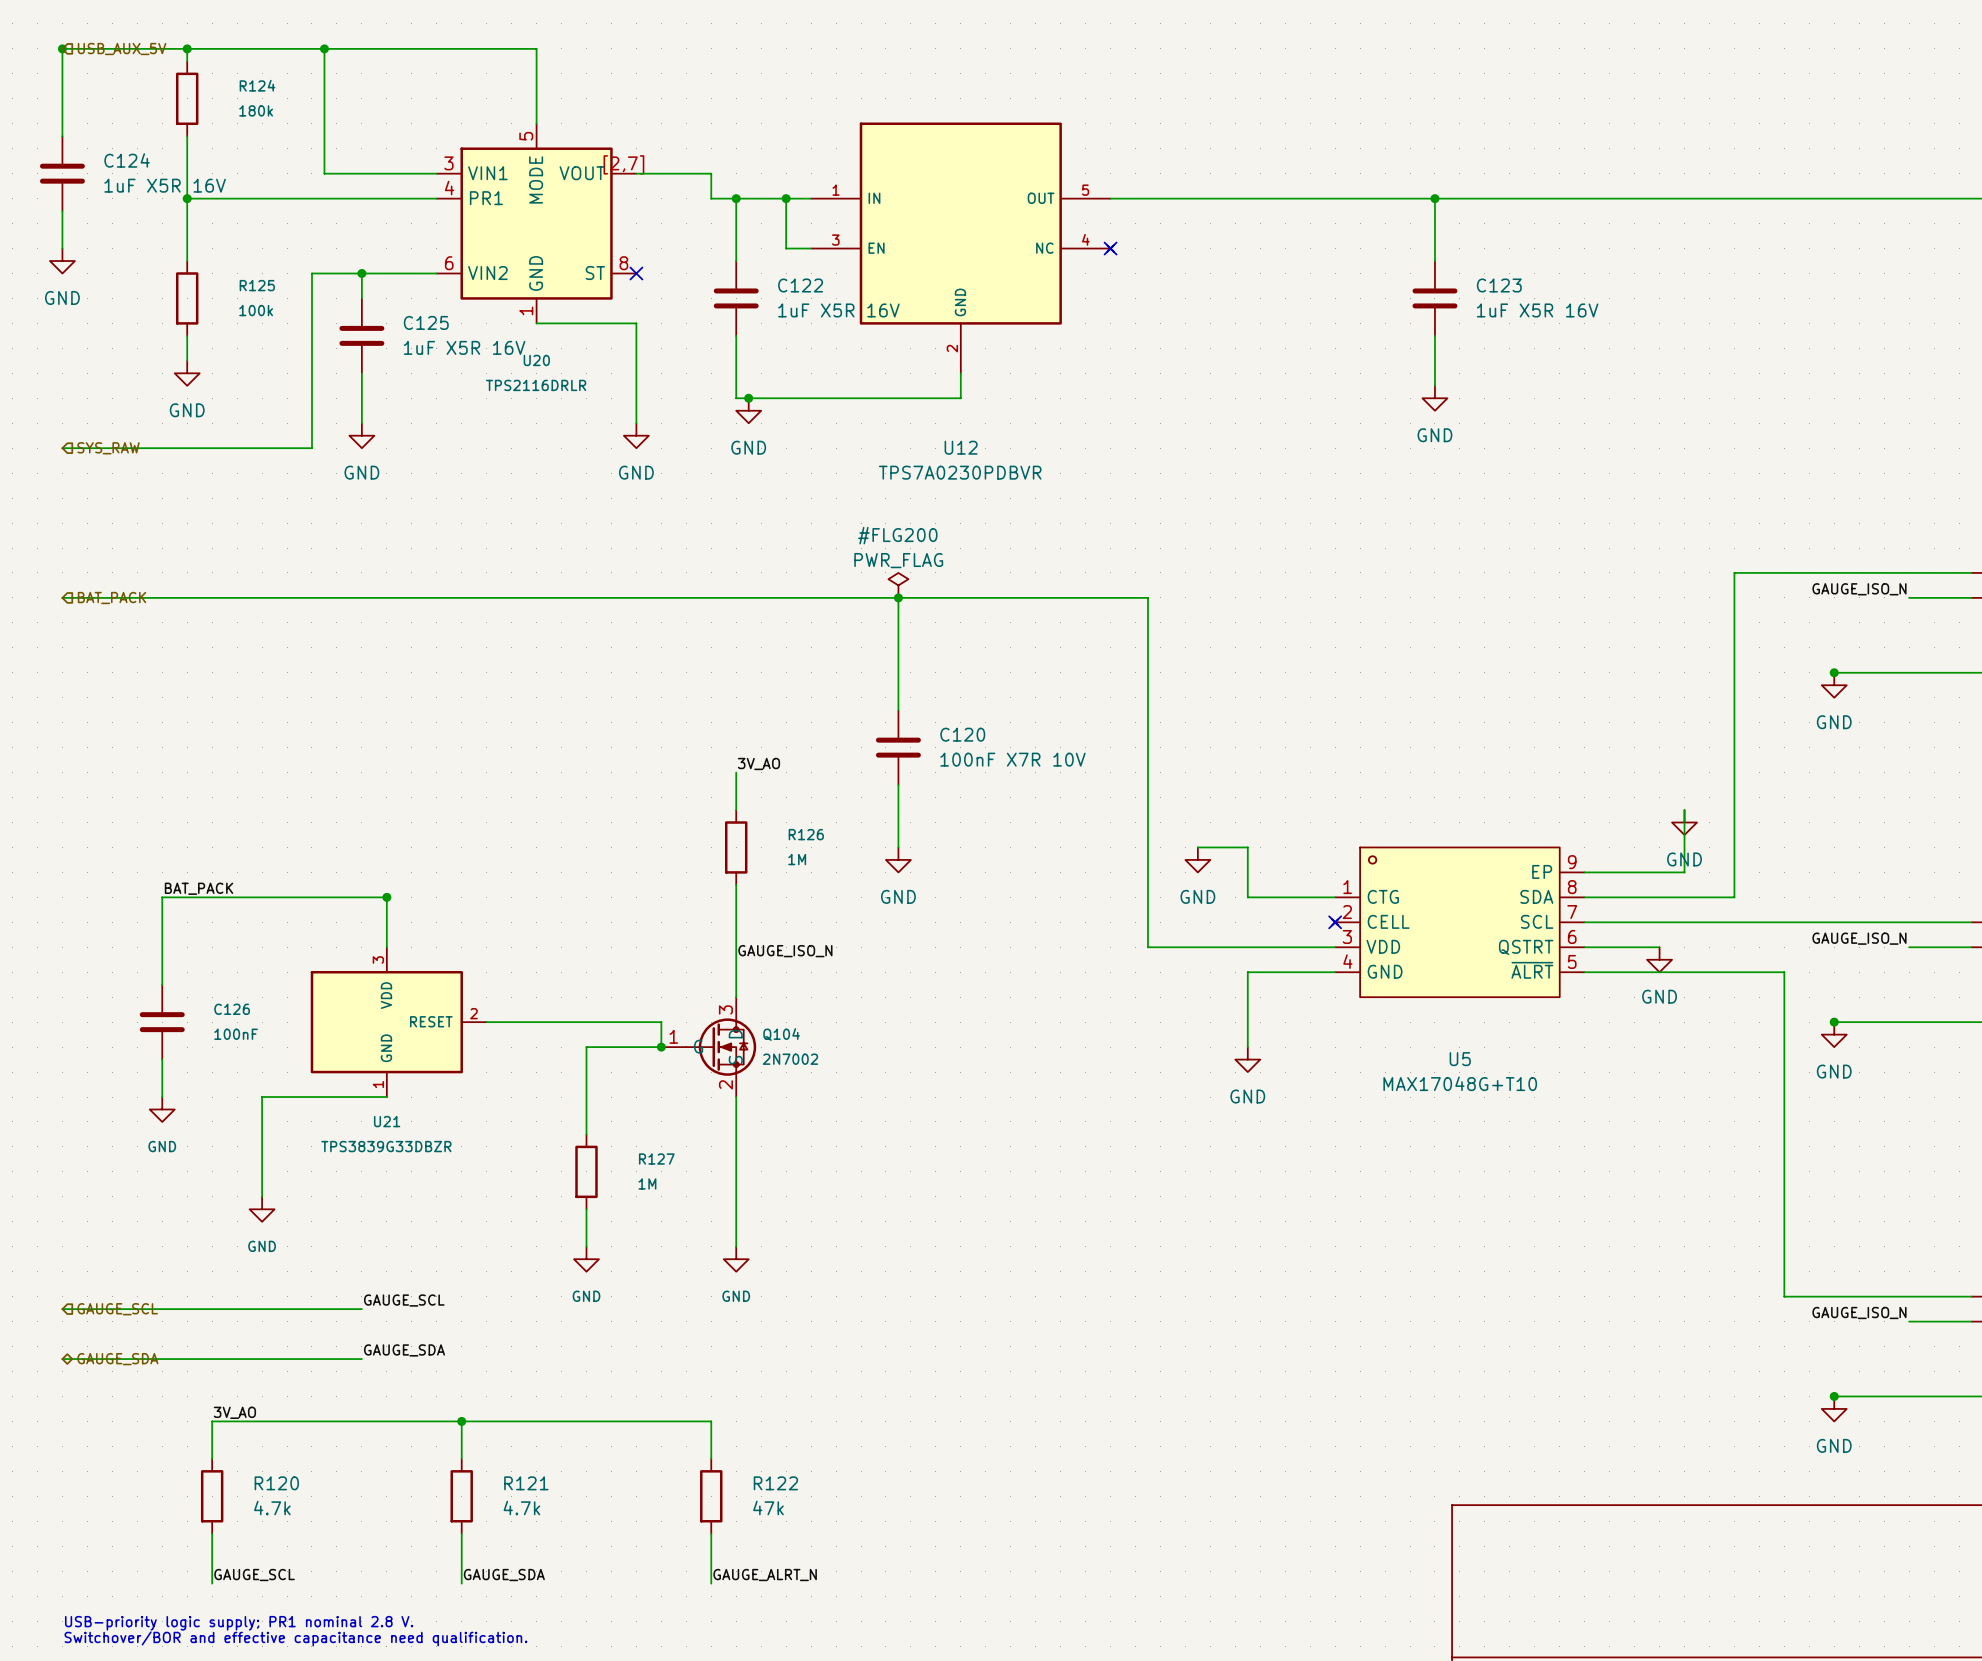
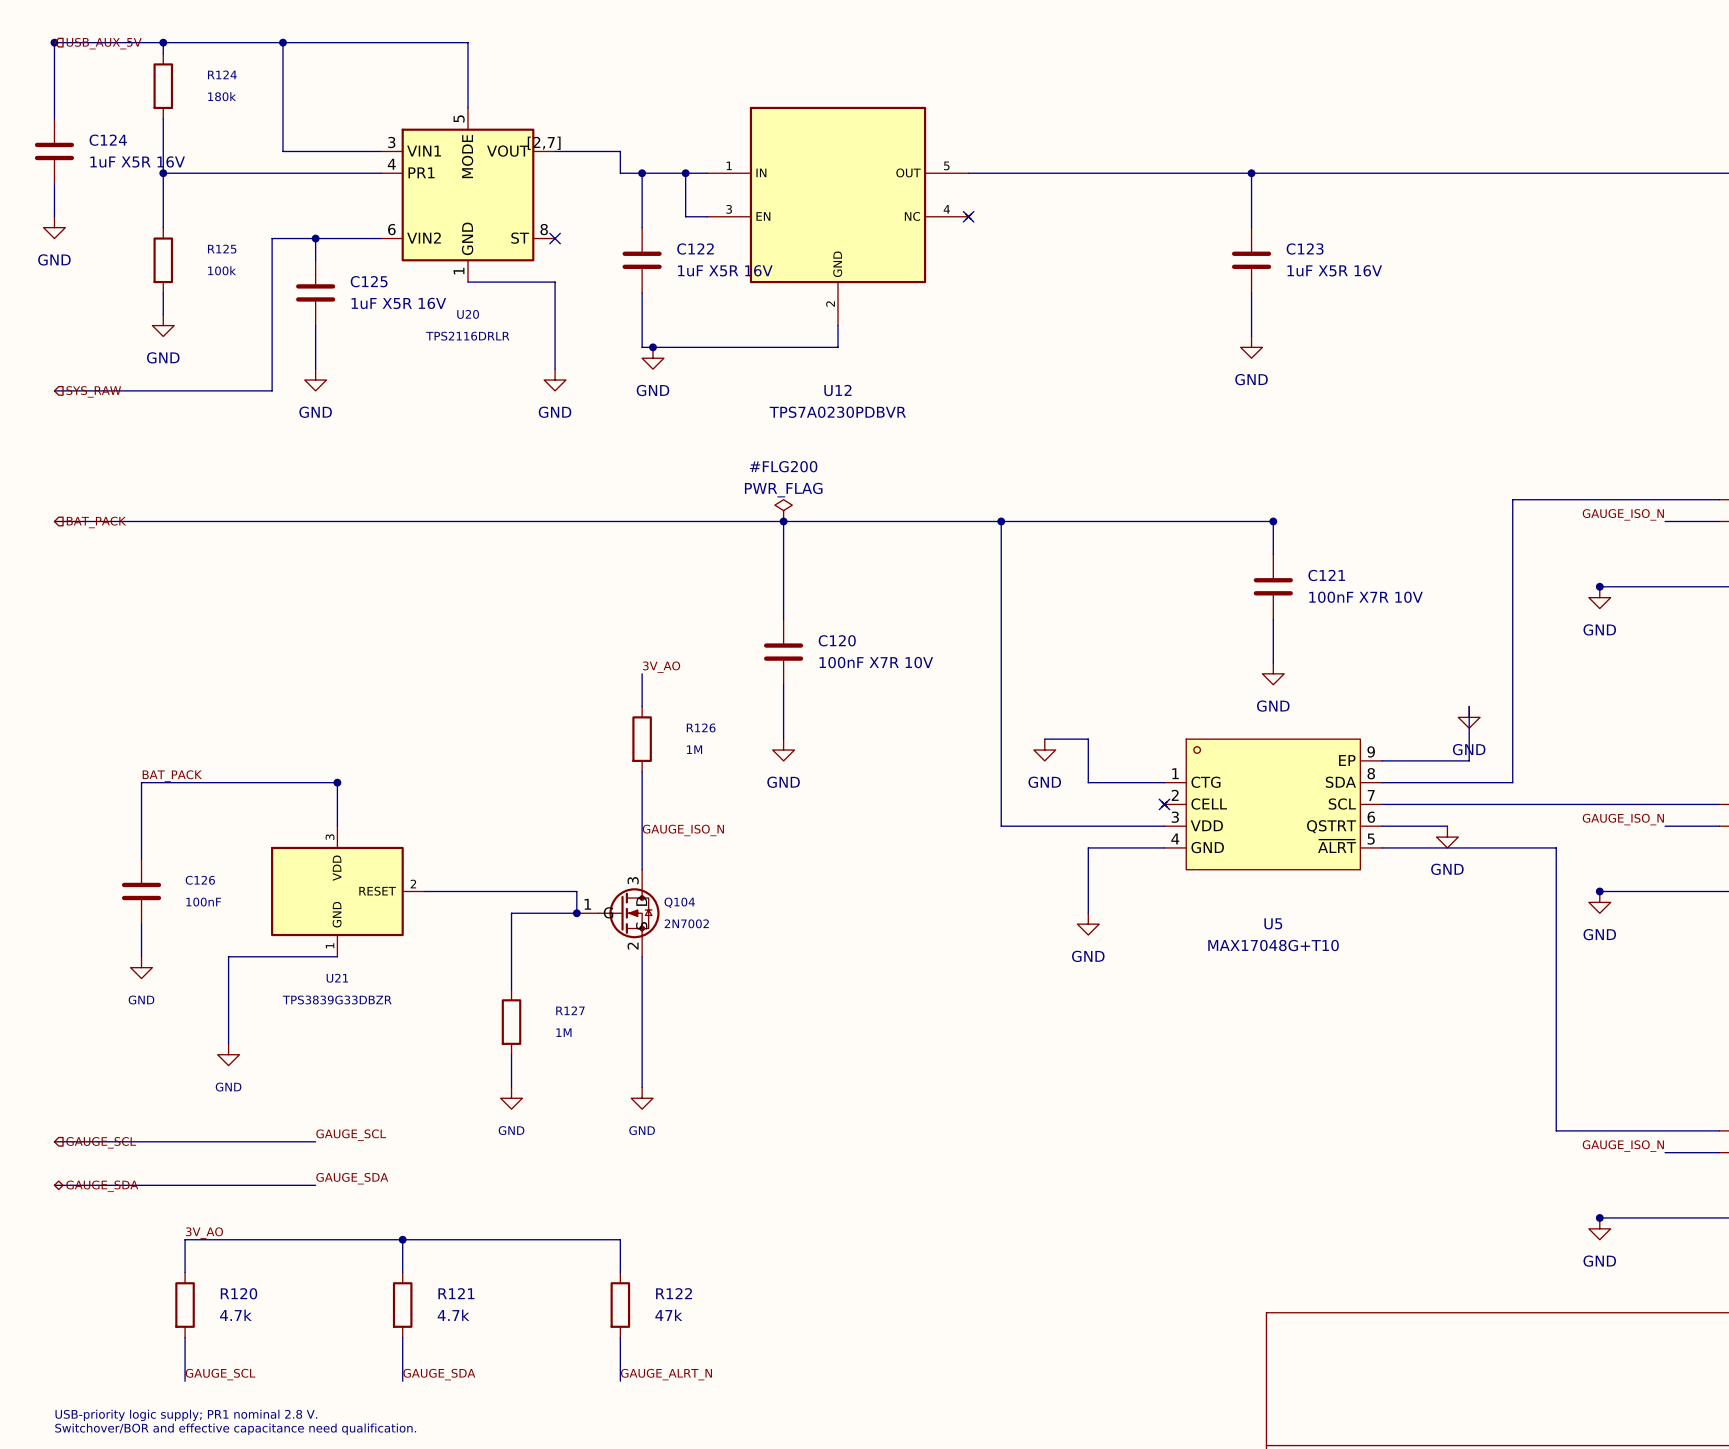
wire: none -> (1001, 521) (1273, 521) (1273, 554)
junction: none -> (1001, 521)
junction: none -> (1273, 521)
C121: none -> 100nF X7R 10V (1273, 586)
wire: none -> (1273, 619) (1273, 662)
power symbol: none -> GND (1273, 673)

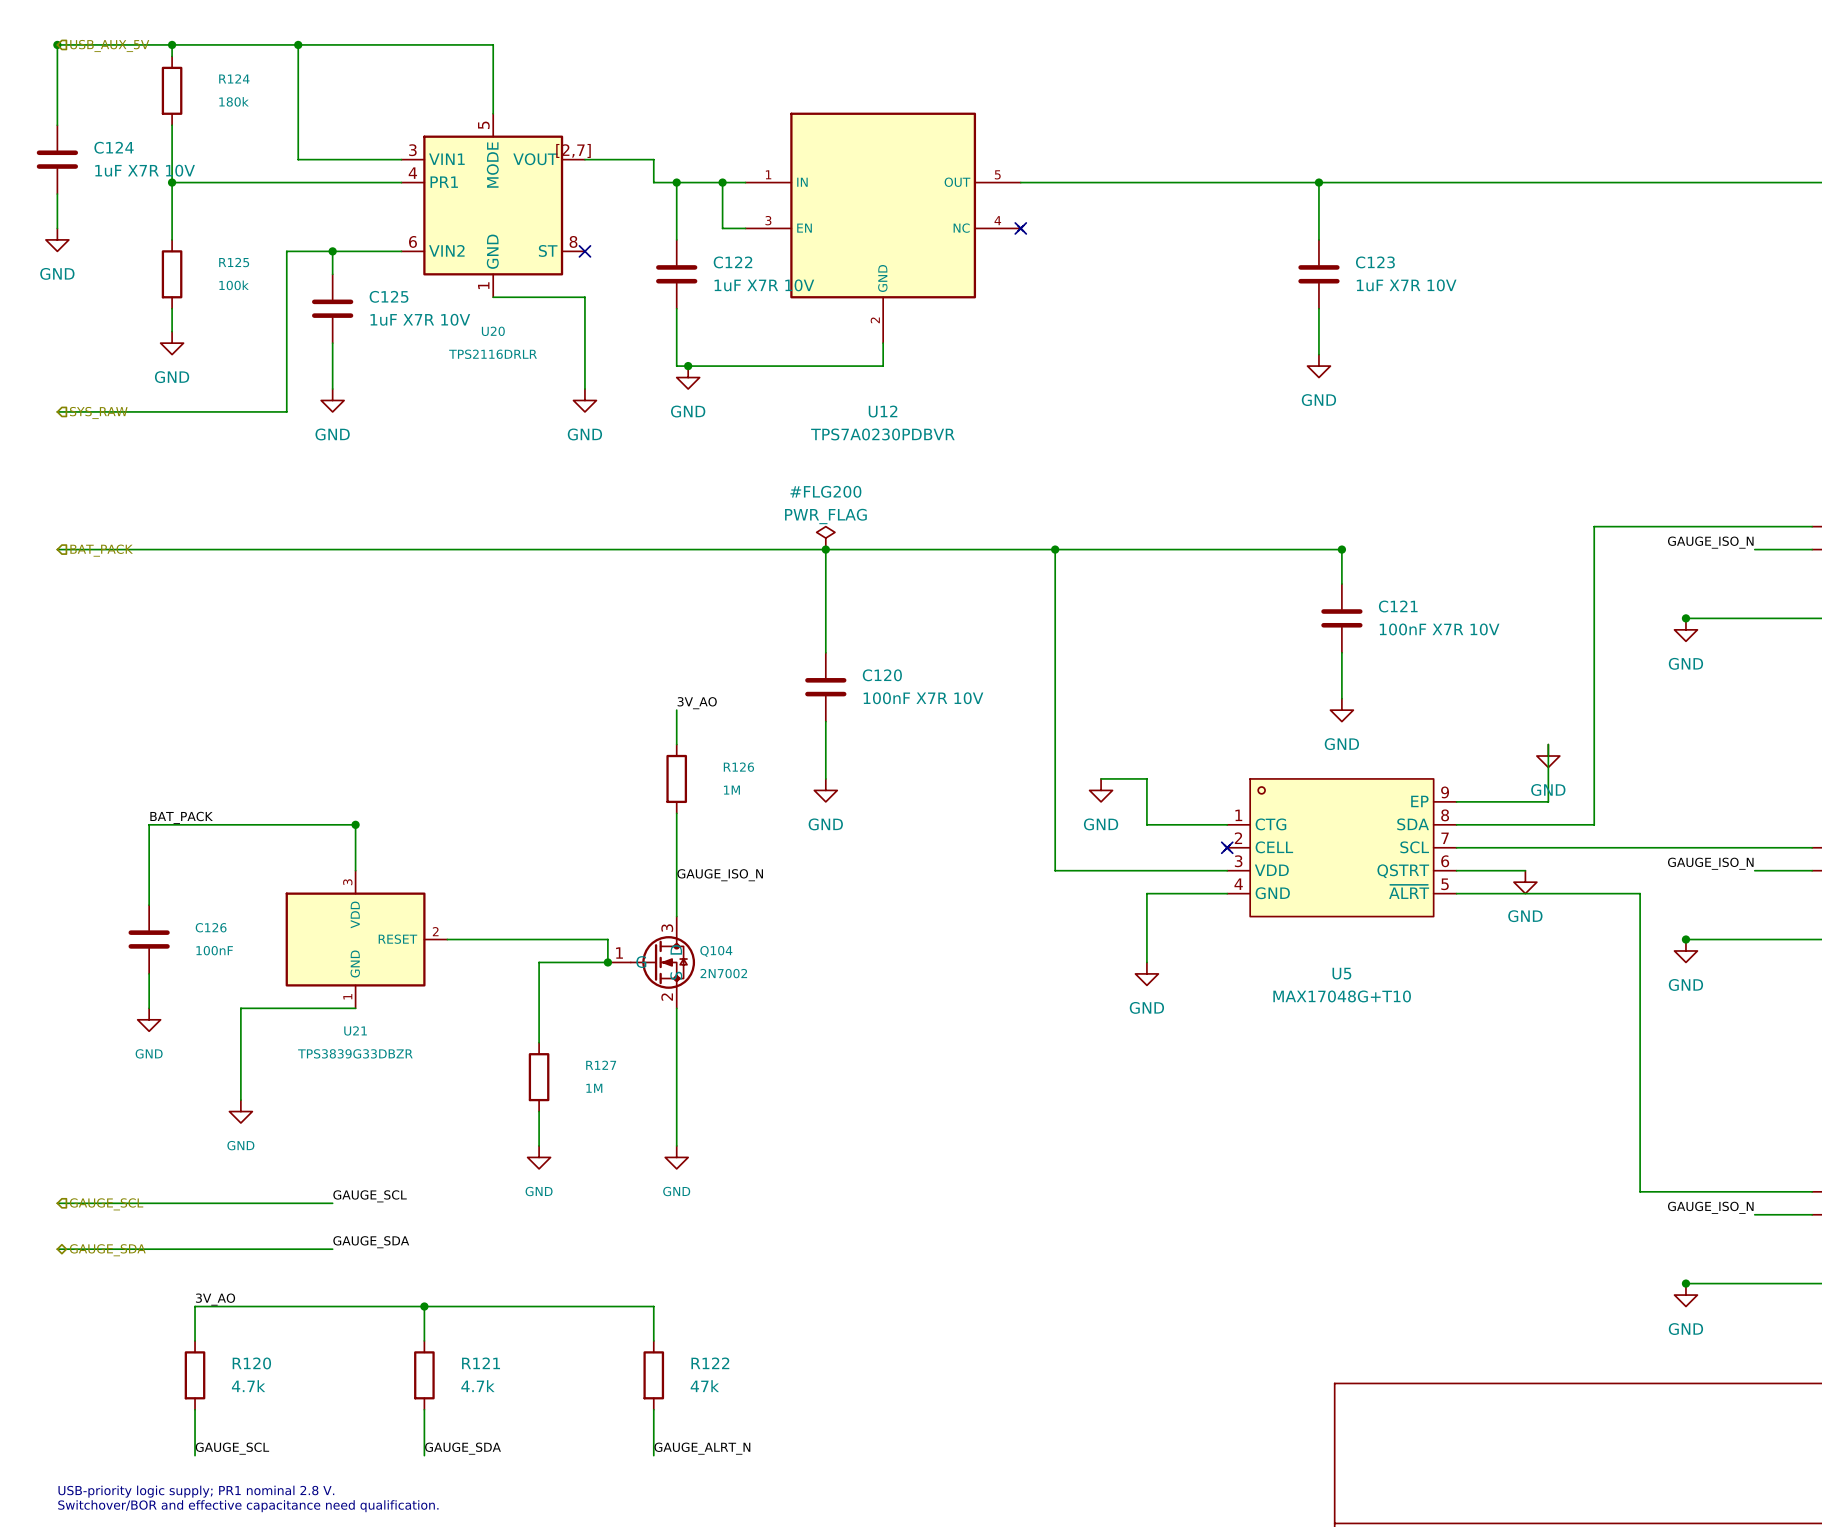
C124 value: 1uF X5R 16V (137, 161) -> 1uF X7R 10V (145, 170)
C122 value: 1uF X5R 16V (725, 270) -> 1uF X7R 10V (764, 285)
C123 value: 1uF X5R 16V (1334, 270) -> 1uF X7R 10V (1406, 285)
C125 value: 1uF X5R 16V (398, 303) -> 1uF X7R 10V (420, 319)

